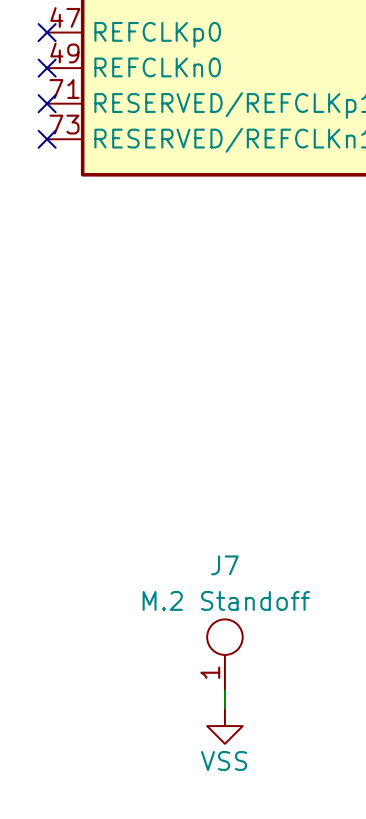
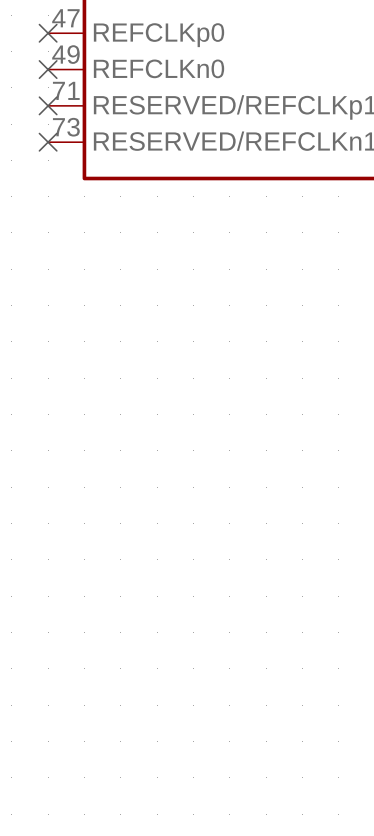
J7: M.2 Standoff (224, 654) -> none
wire: (224, 690) (224, 708) -> none
power symbol: VSS (224, 726) -> none

